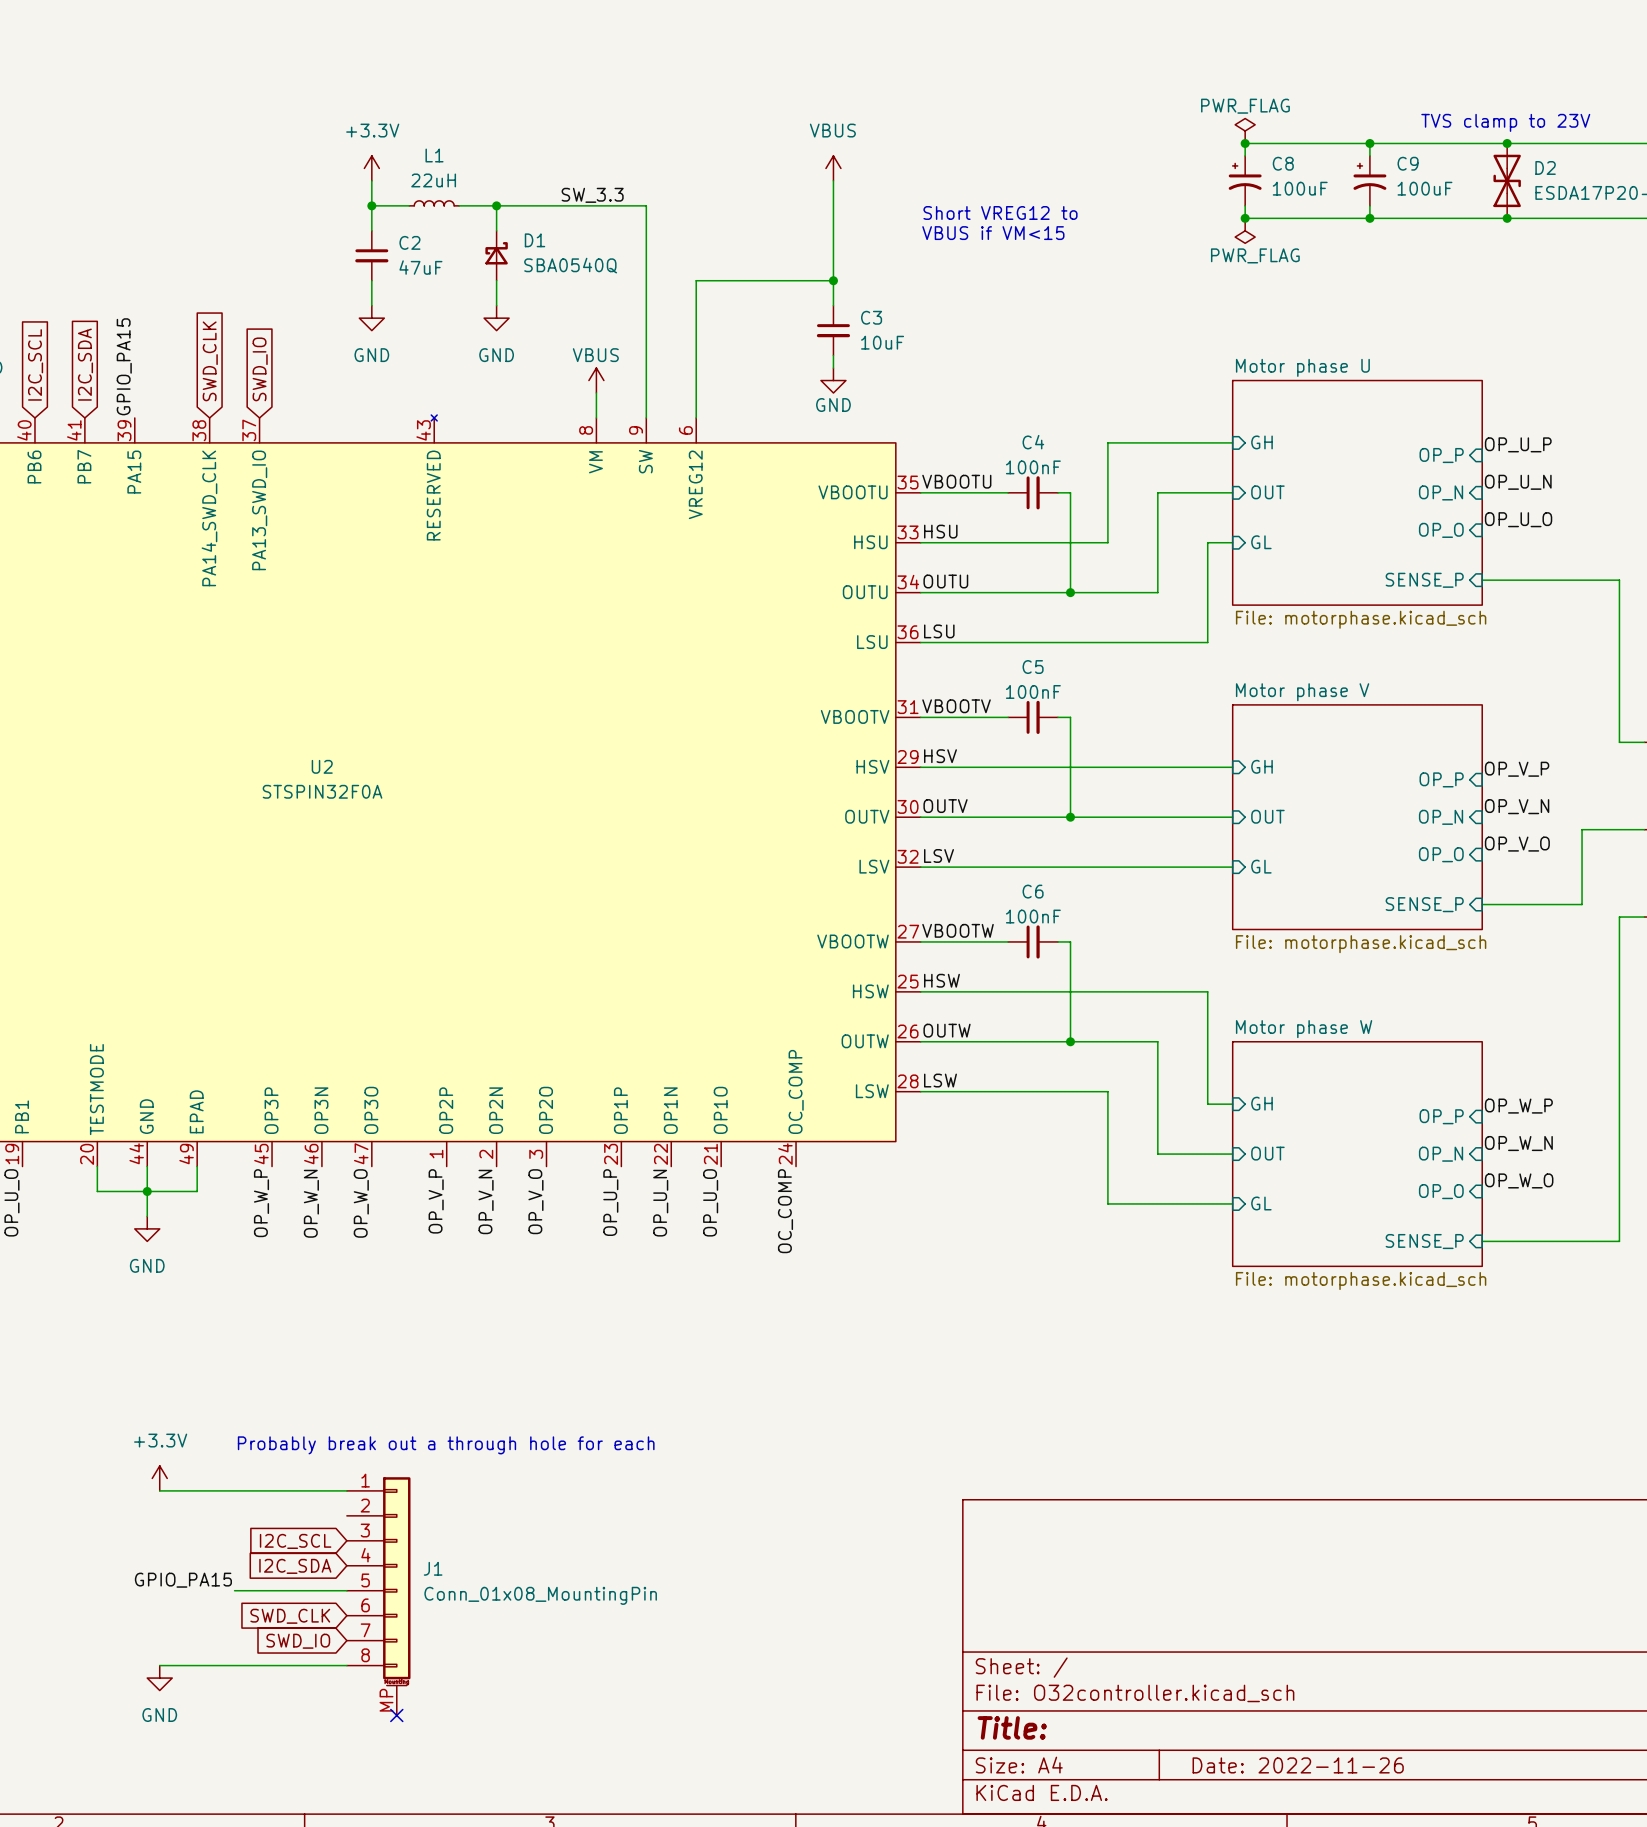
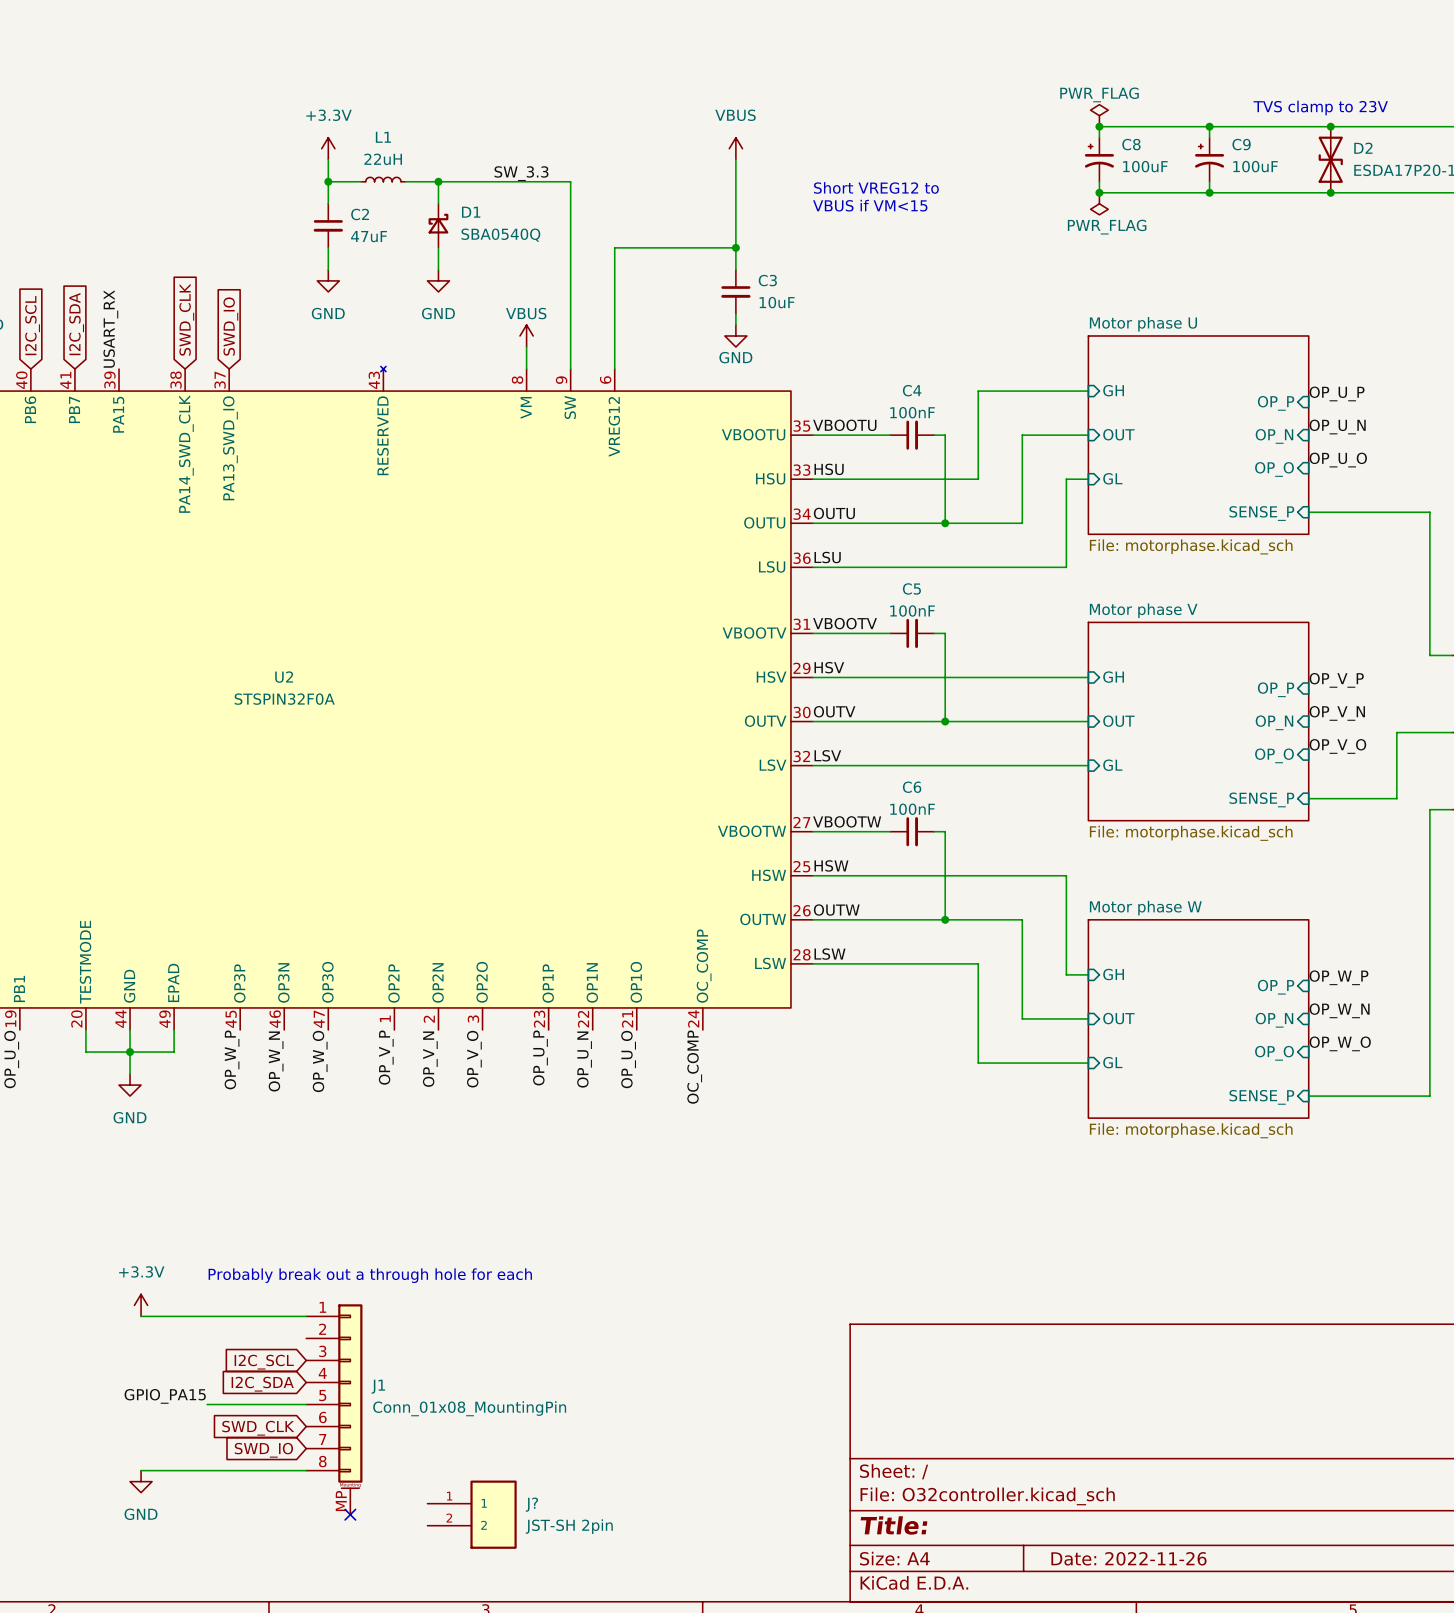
label: GPIO_PA15 (124, 366) -> USART_RX (110, 329)
J?: none -> JST-SH 2pin (472, 1514)

